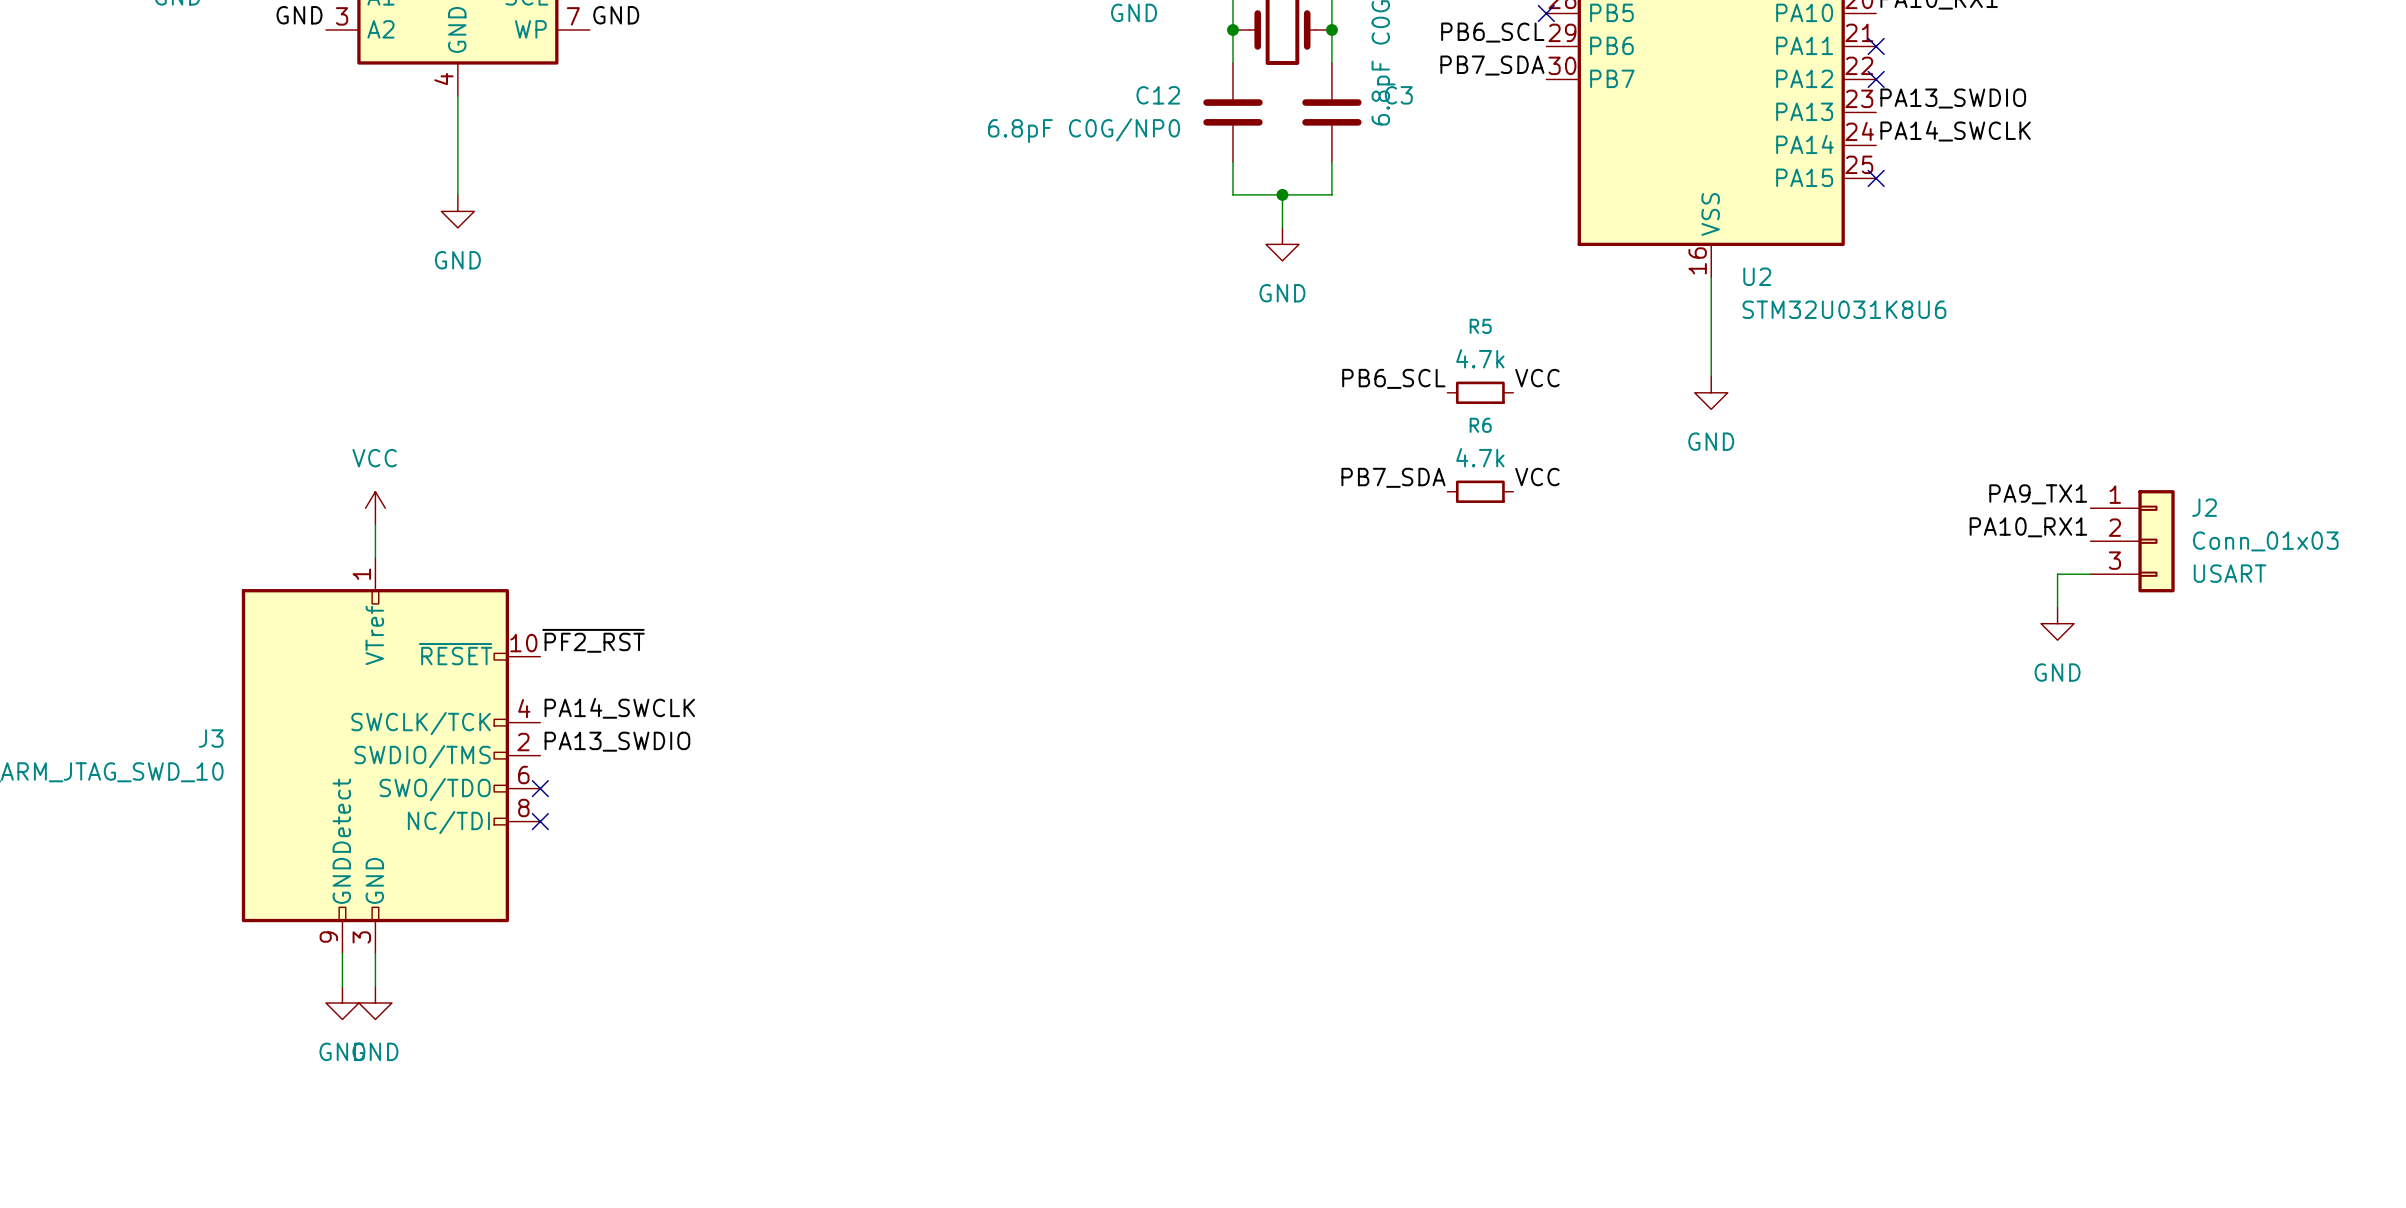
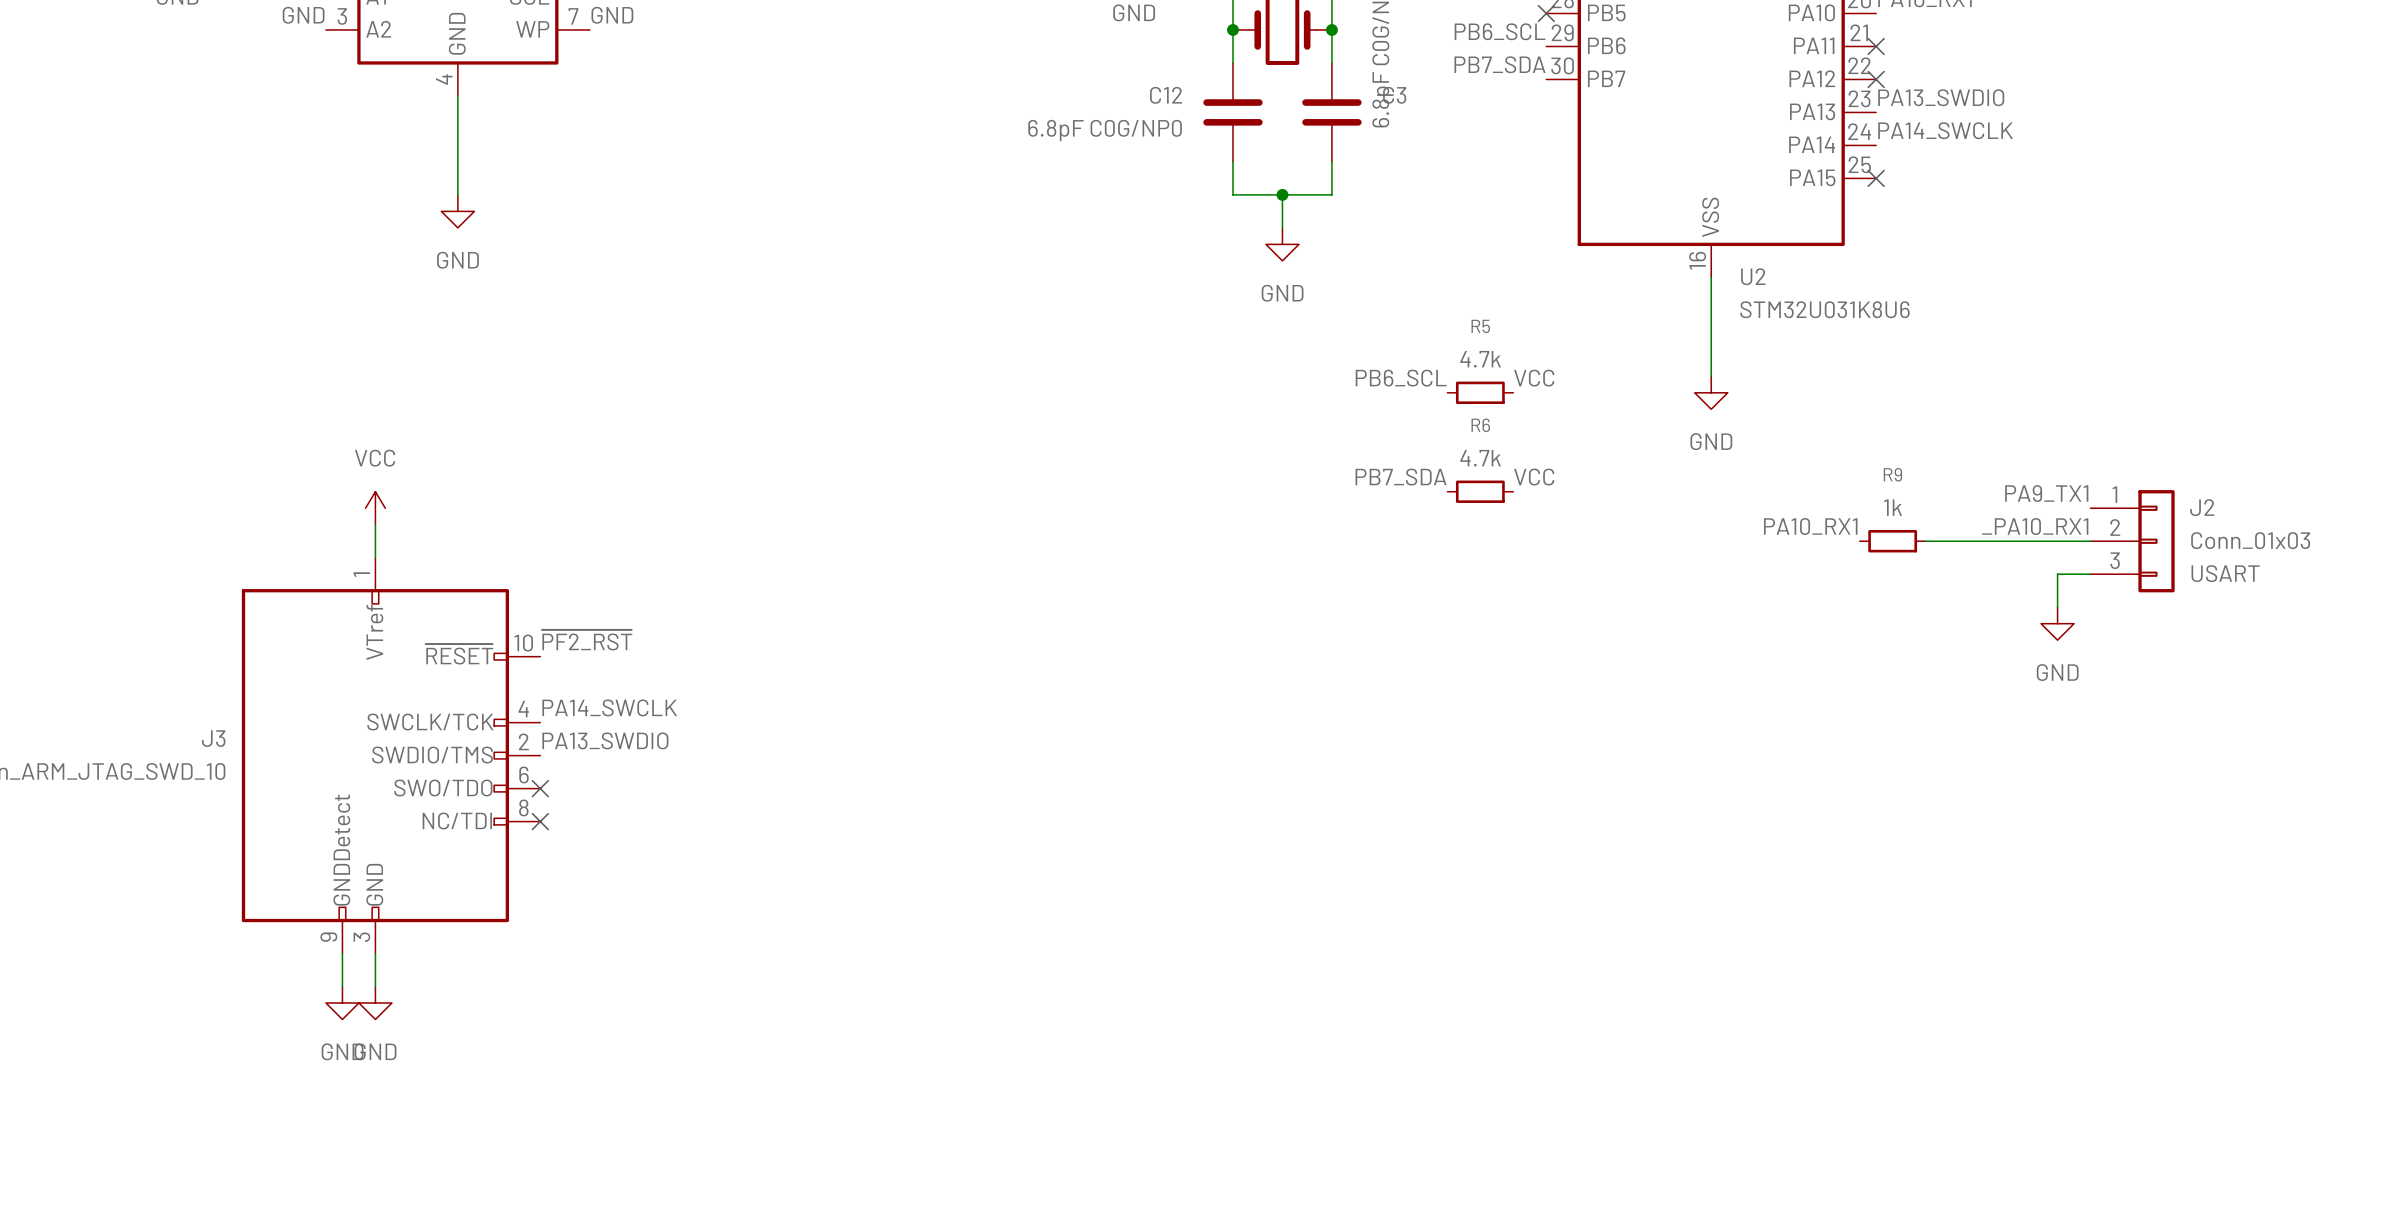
label: none -> PA10_RX1 (1810, 526)
label: PA10_RX1 (2028, 527) -> _PA10_RX1 (2035, 526)
R9: none -> 1k (1892, 541)
wire: none -> (1925, 541) (2090, 541)

